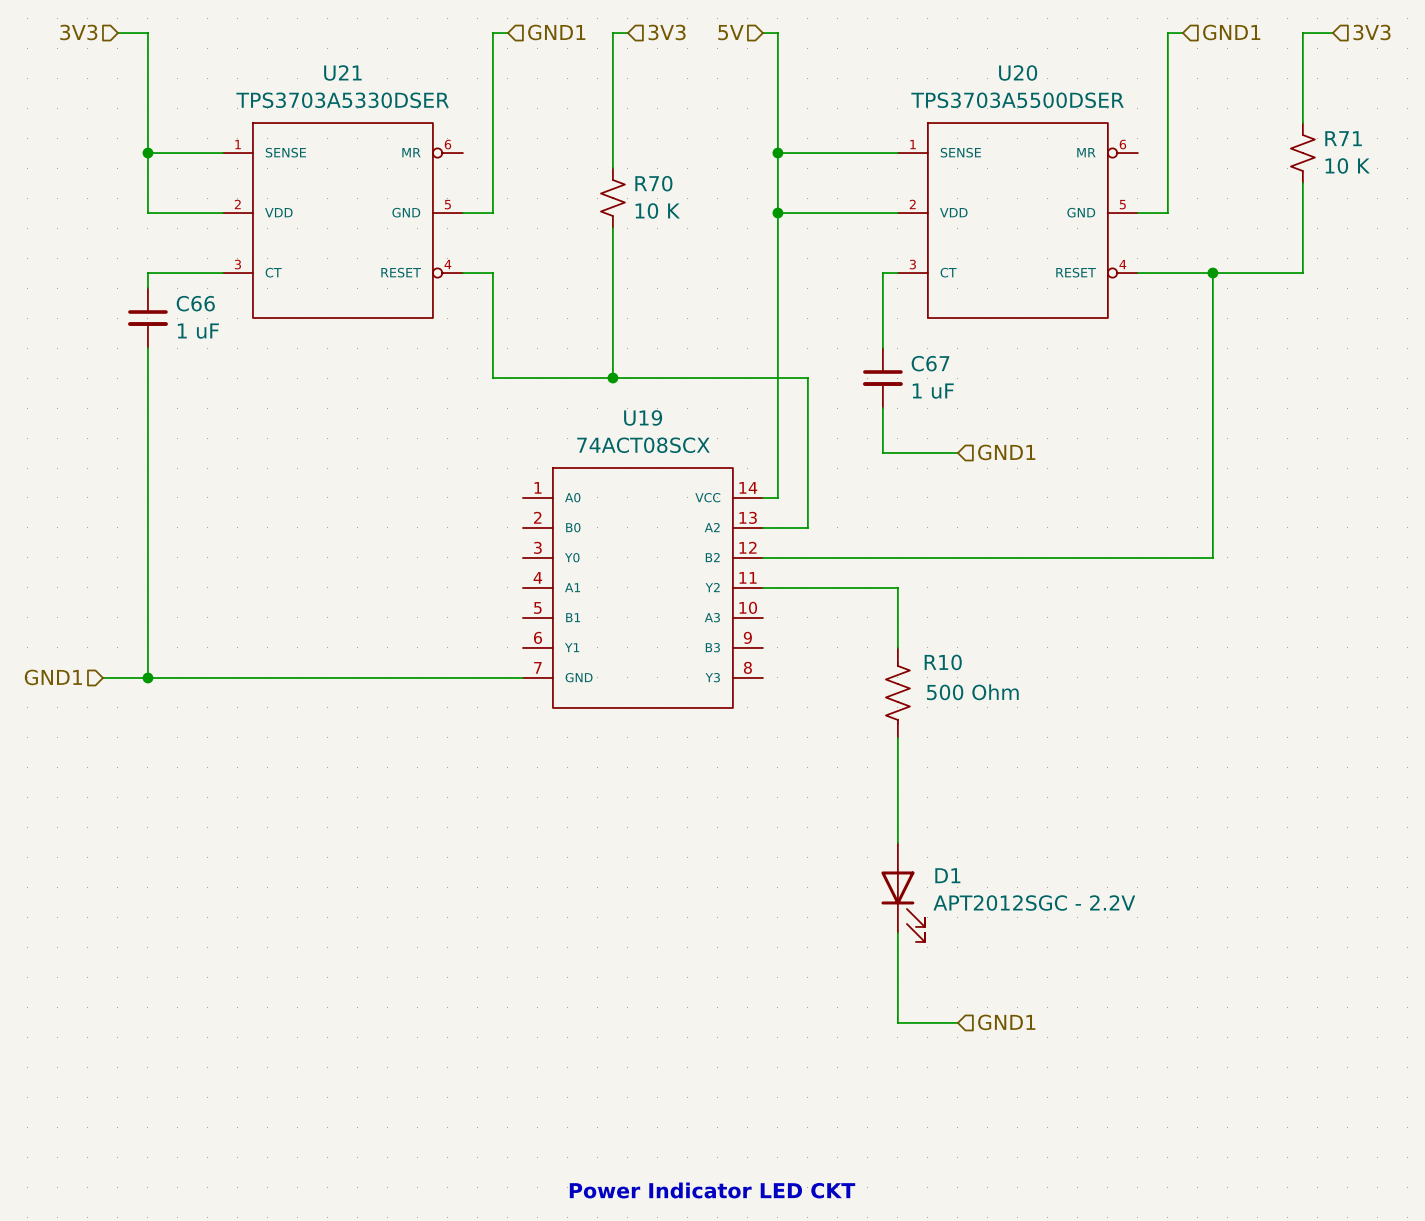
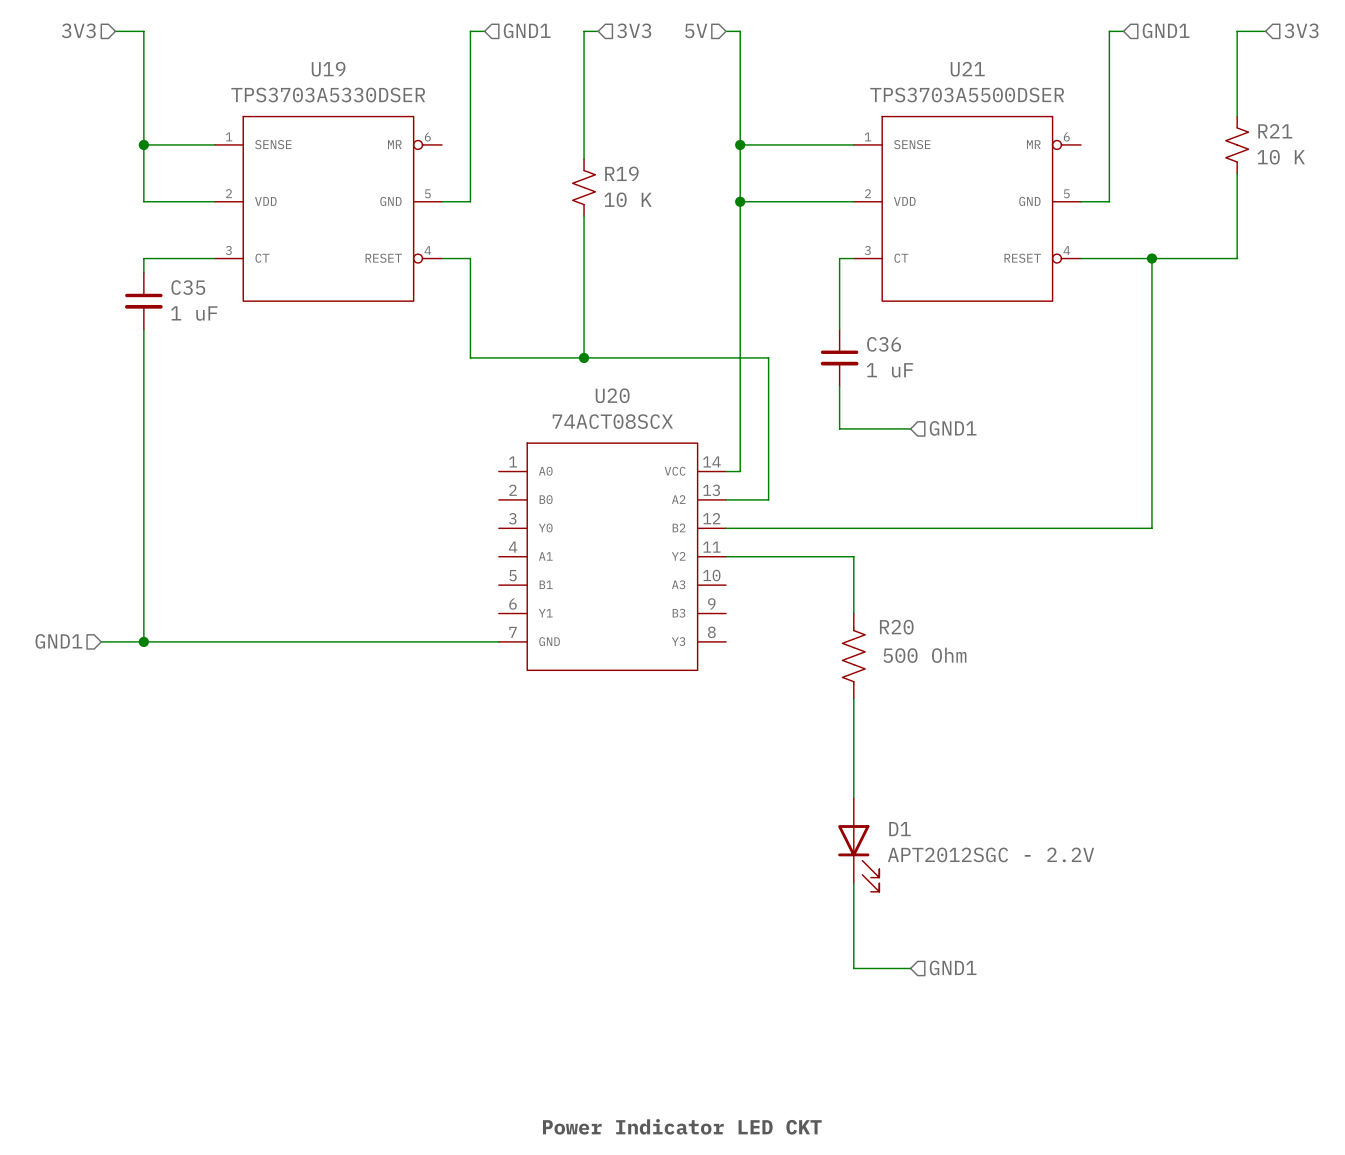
U21 name: U21 (342, 72) -> U19 (328, 69)
U20 name: U20 (1018, 72) -> U21 (967, 69)
R71 name: R71 (1343, 138) -> R21 (1275, 131)
R70 name: R70 (653, 183) -> R19 (621, 173)
C66 name: C66 (195, 303) -> C35 (188, 287)
C67 name: C67 (930, 363) -> C36 (884, 344)
U19 name: U19 (643, 417) -> U20 (612, 395)
R10 name: R10 (943, 662) -> R20 (896, 627)

